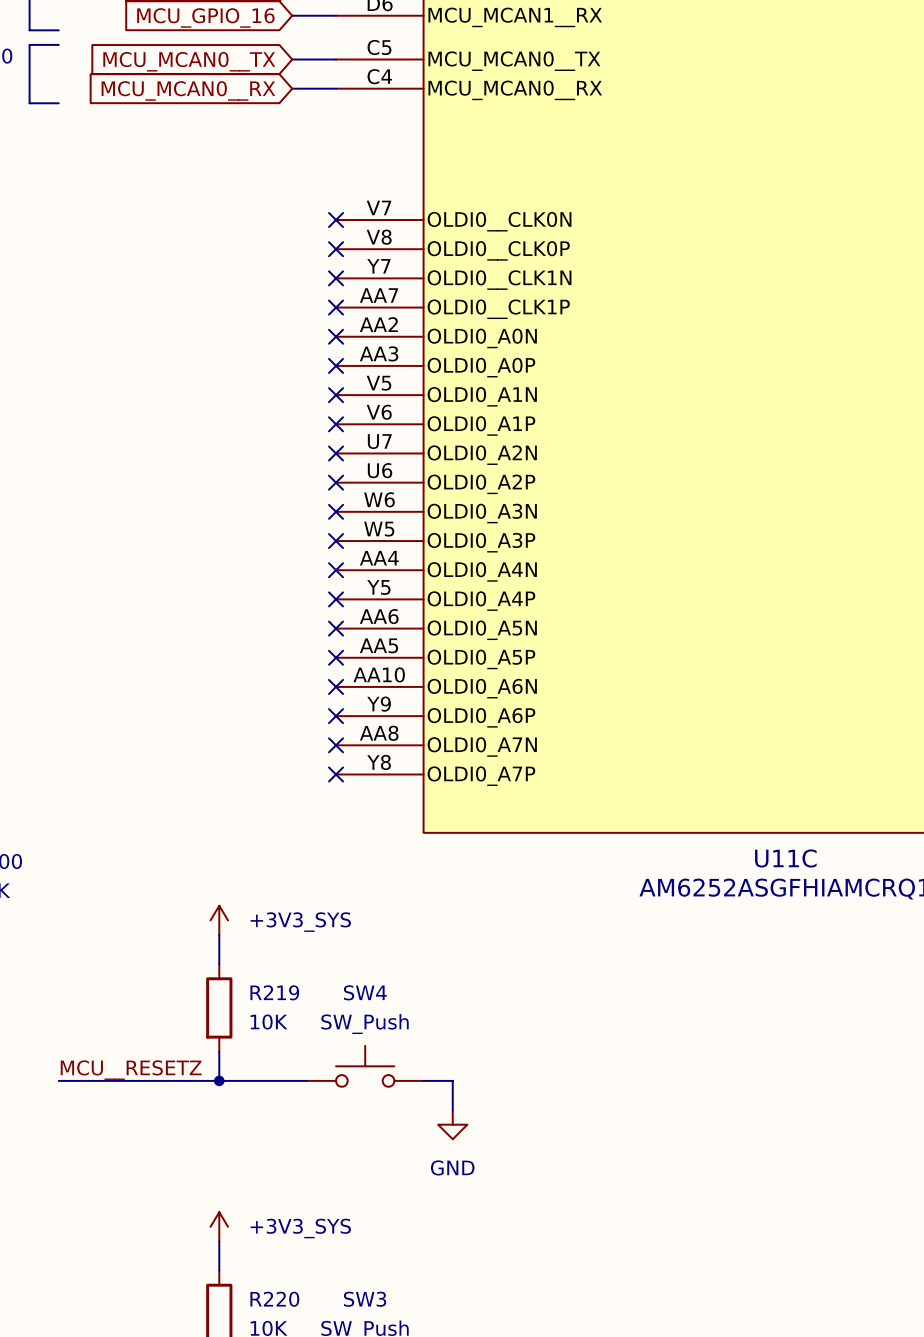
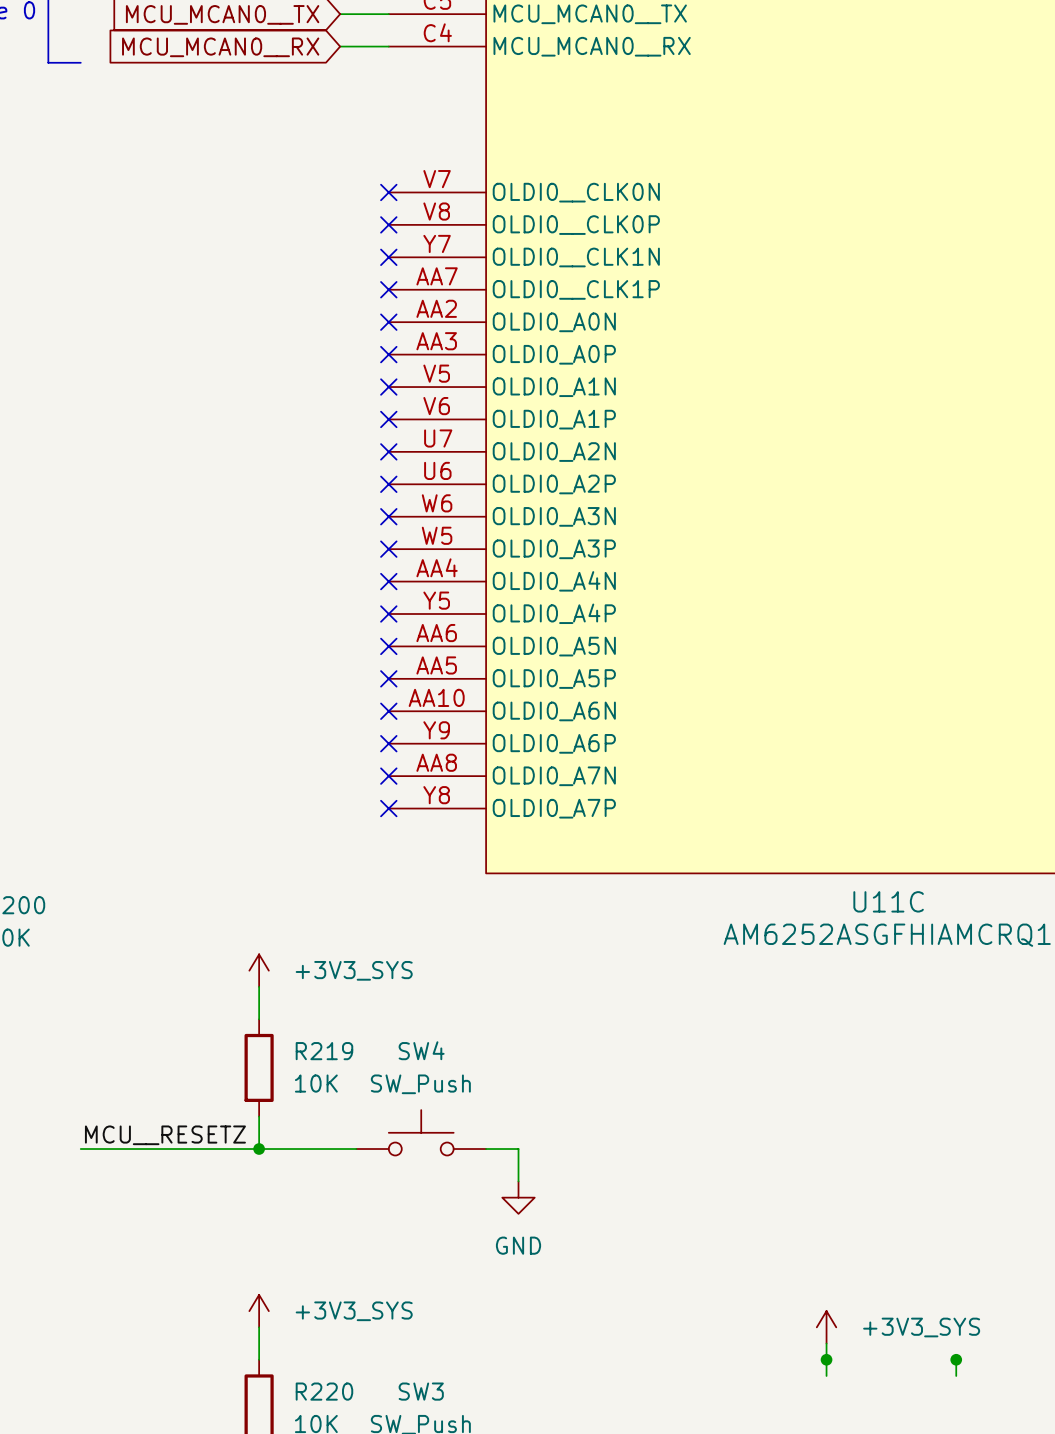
power symbol: none -> +3V3_SYS (826, 1327)
wire: none -> (826, 1343) (826, 1375)
junction: none -> (826, 1359)
wire: none -> (956, 1359) (956, 1375)
junction: none -> (956, 1359)

